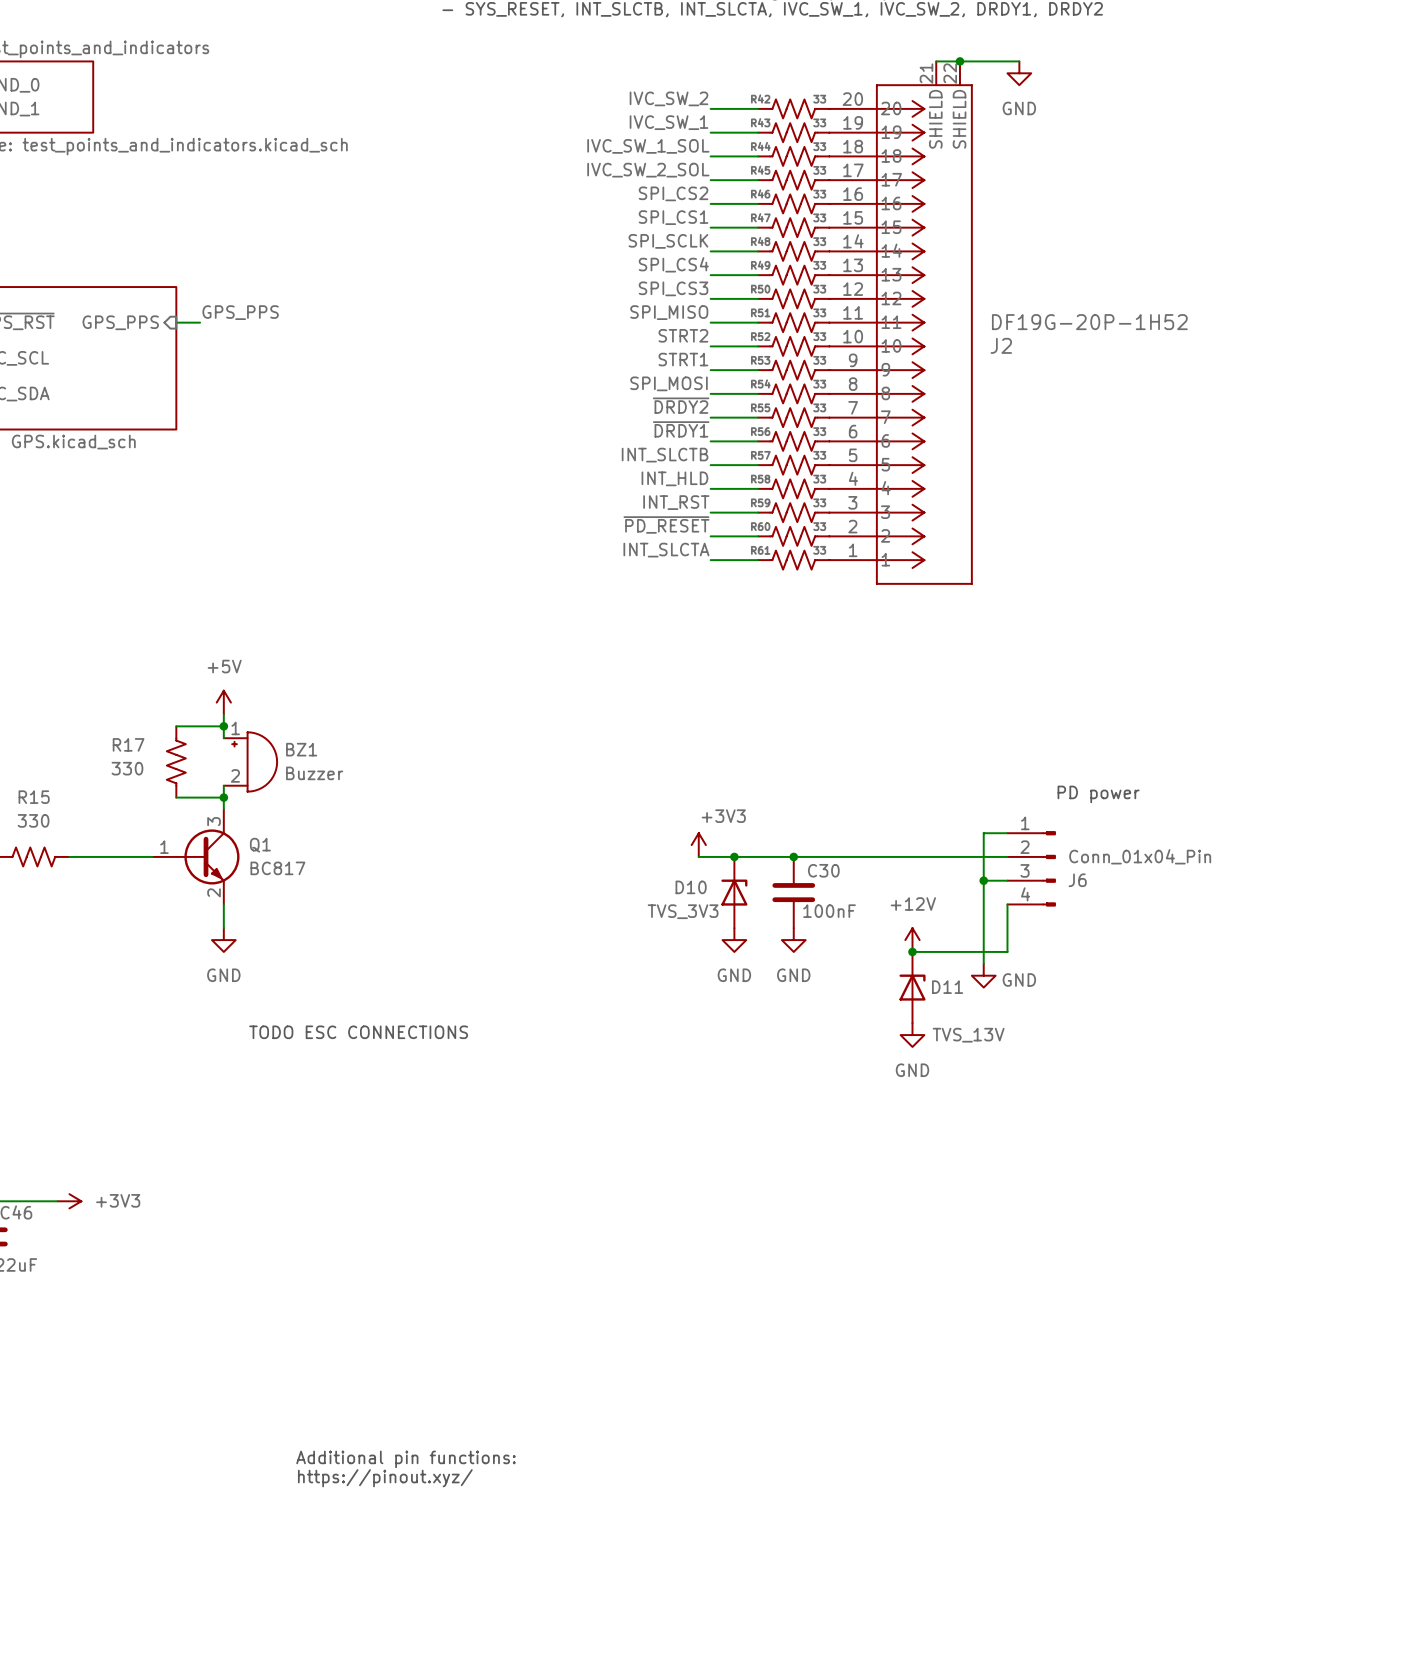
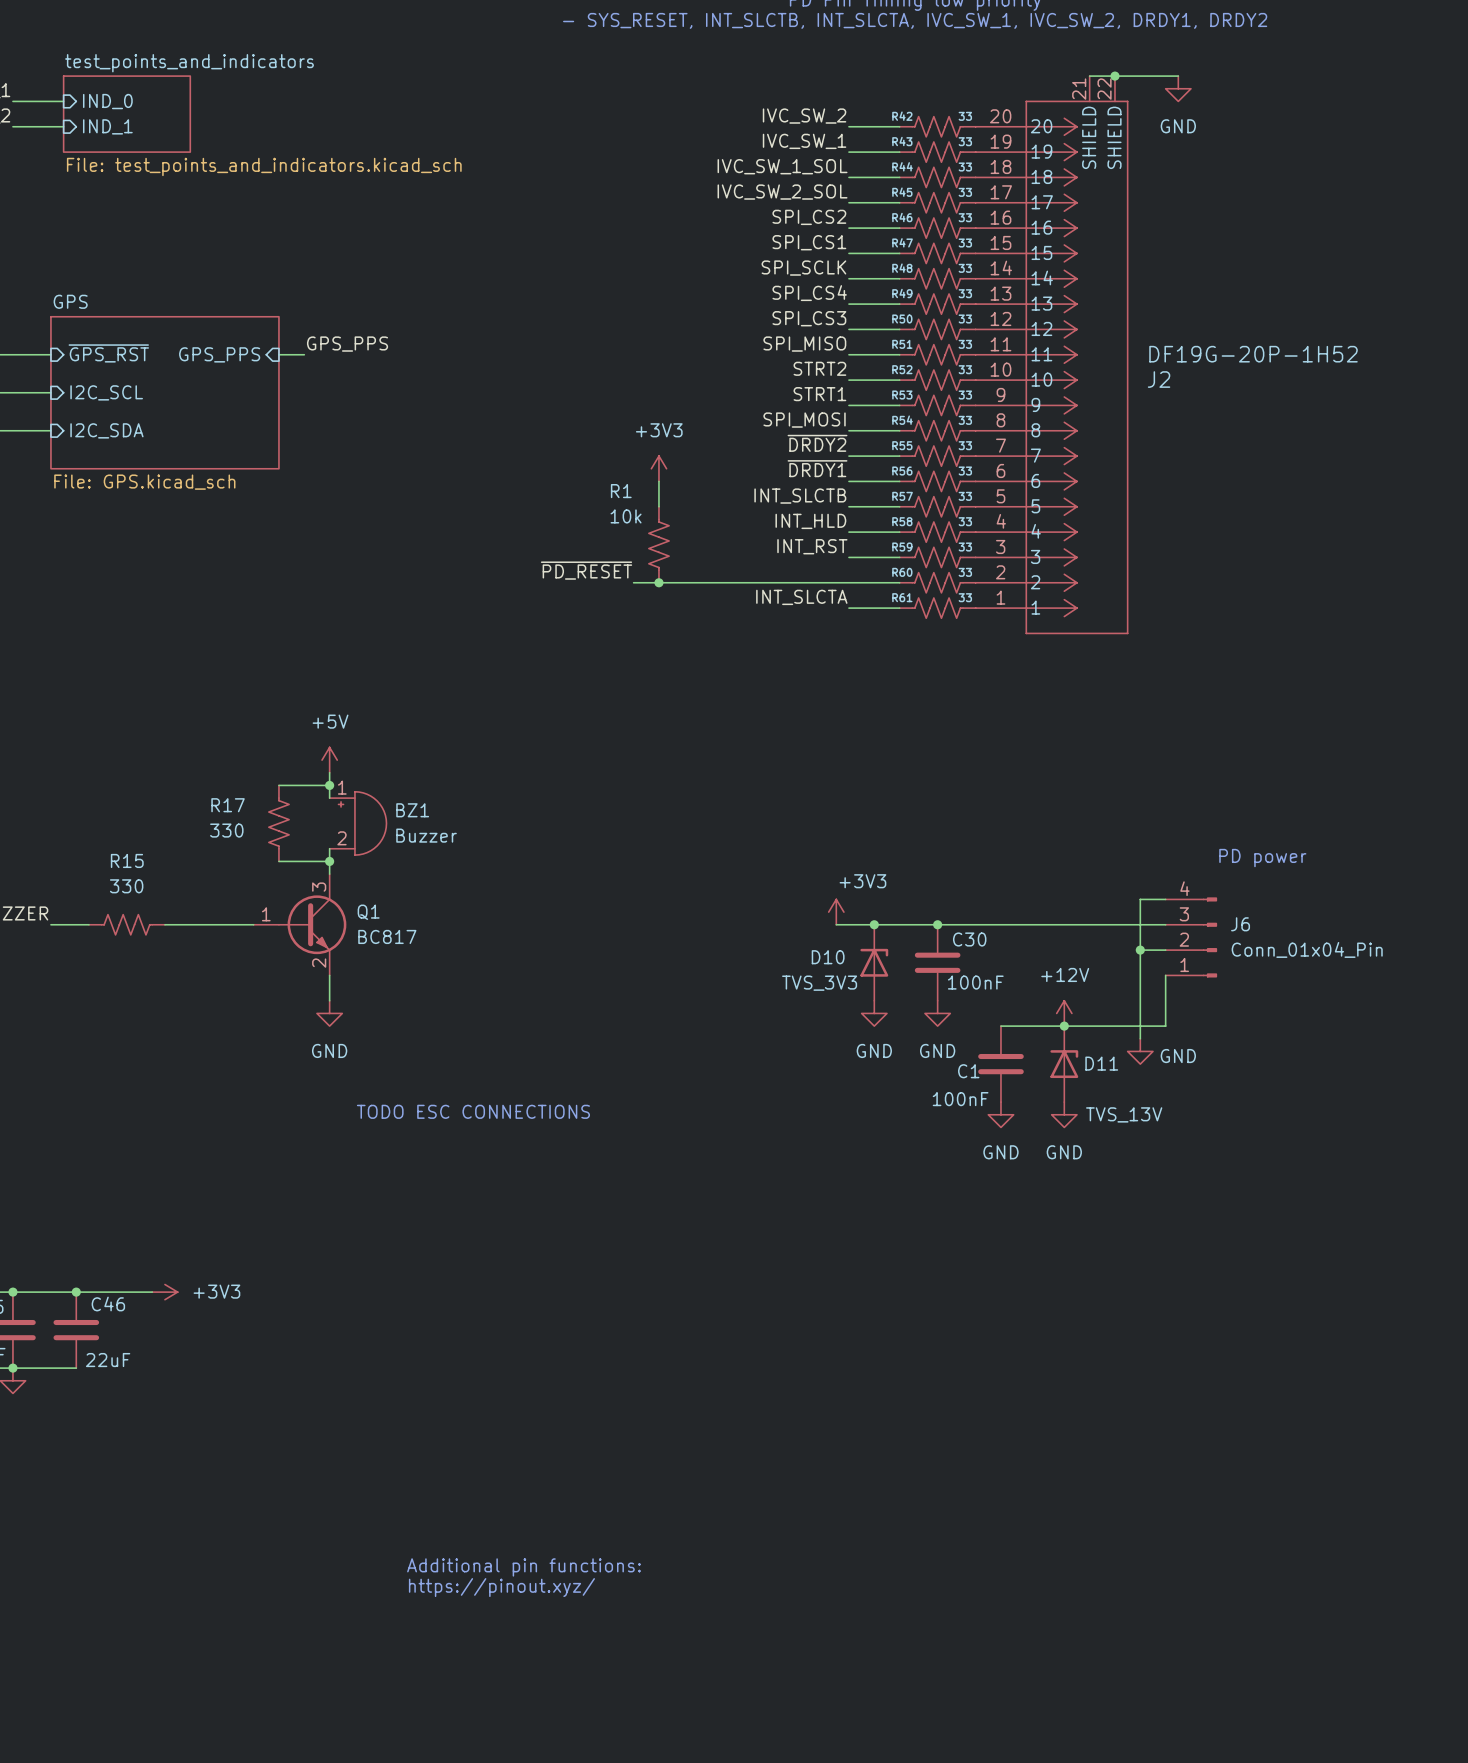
power symbol: none -> +3V3 (658, 468)
wire: none -> (658, 481) (658, 506)
R1: none -> 10k (658, 544)
label position: ~{PD_RESET} (666, 524) -> ~{PD_RESET} (586, 570)
wire: none -> (633, 582) (848, 582)
junction: none -> (658, 582)
J6 flip: as is (1049, 868) -> up-down (1209, 937)
wire: none -> (1000, 1026) (1064, 1026)
C1: none -> 100nF (1000, 1064)
power symbol: none -> GND (1000, 1114)

